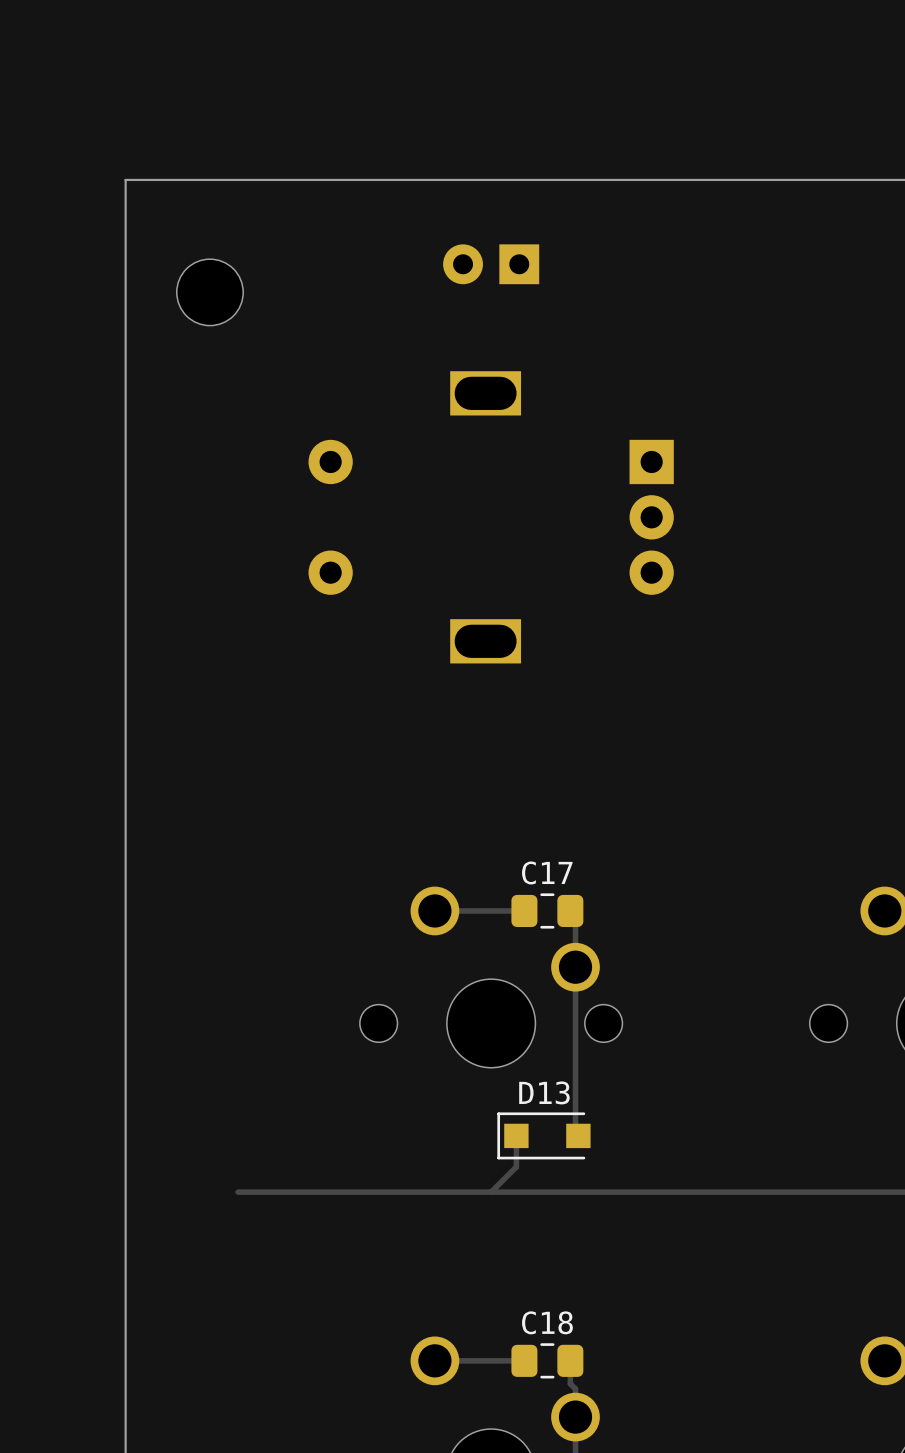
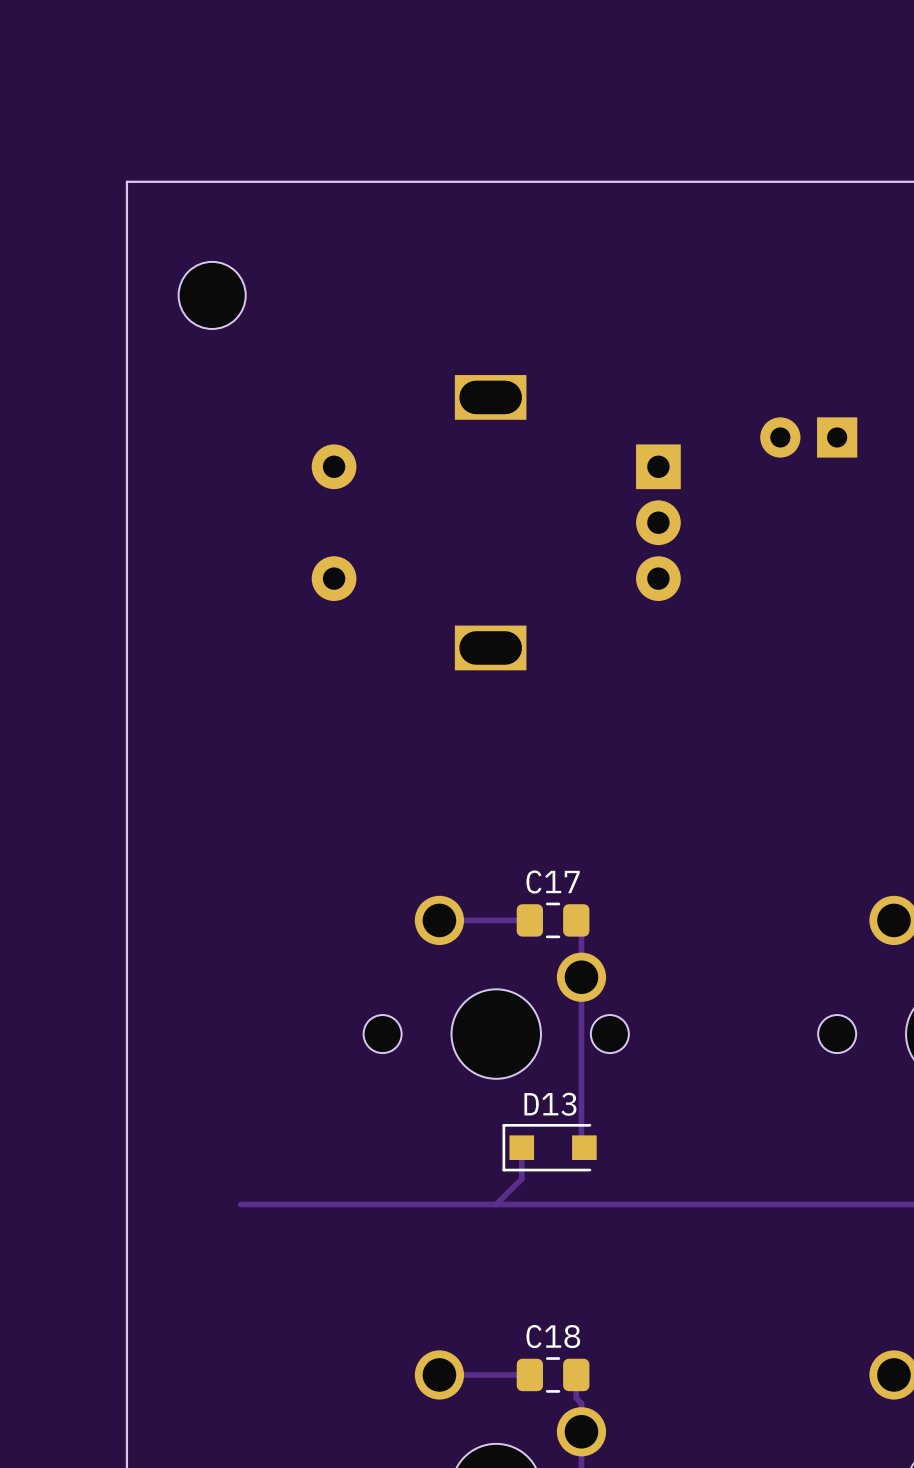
part position: (491, 264) -> (808, 437)

